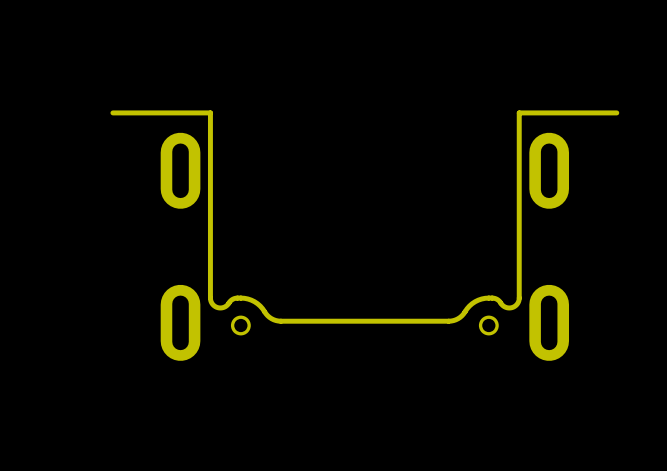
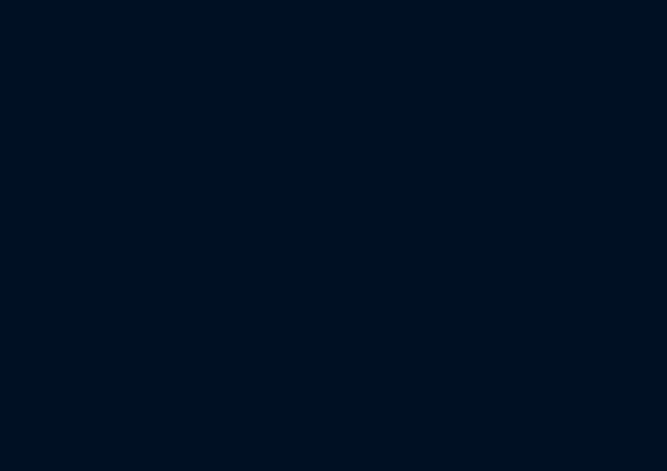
part: (364, 235) -> none

